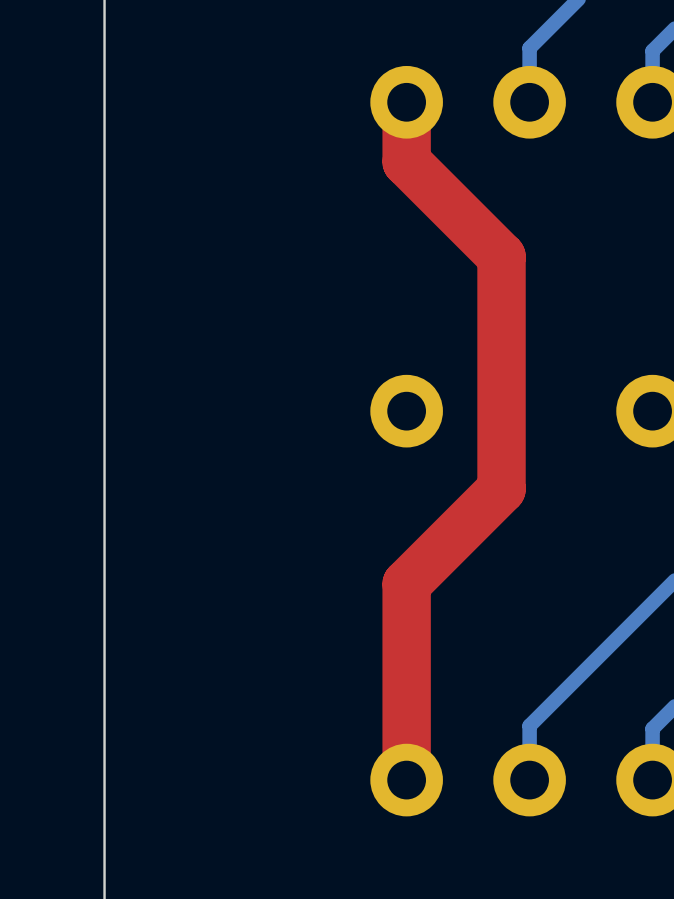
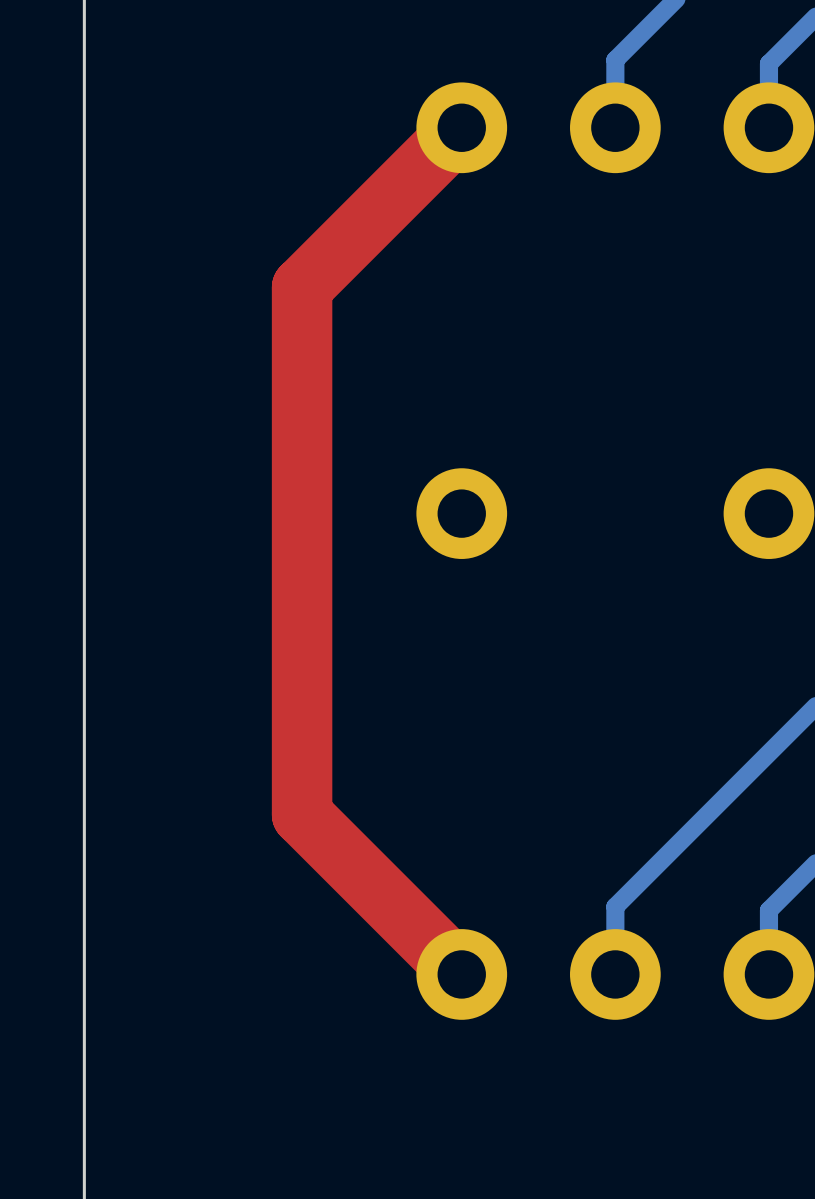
top track: (406, 102) (406, 161) (501, 256) (501, 489) (406, 584) (406, 780) -> (461, 127) (302, 287) (302, 814) (461, 974)

